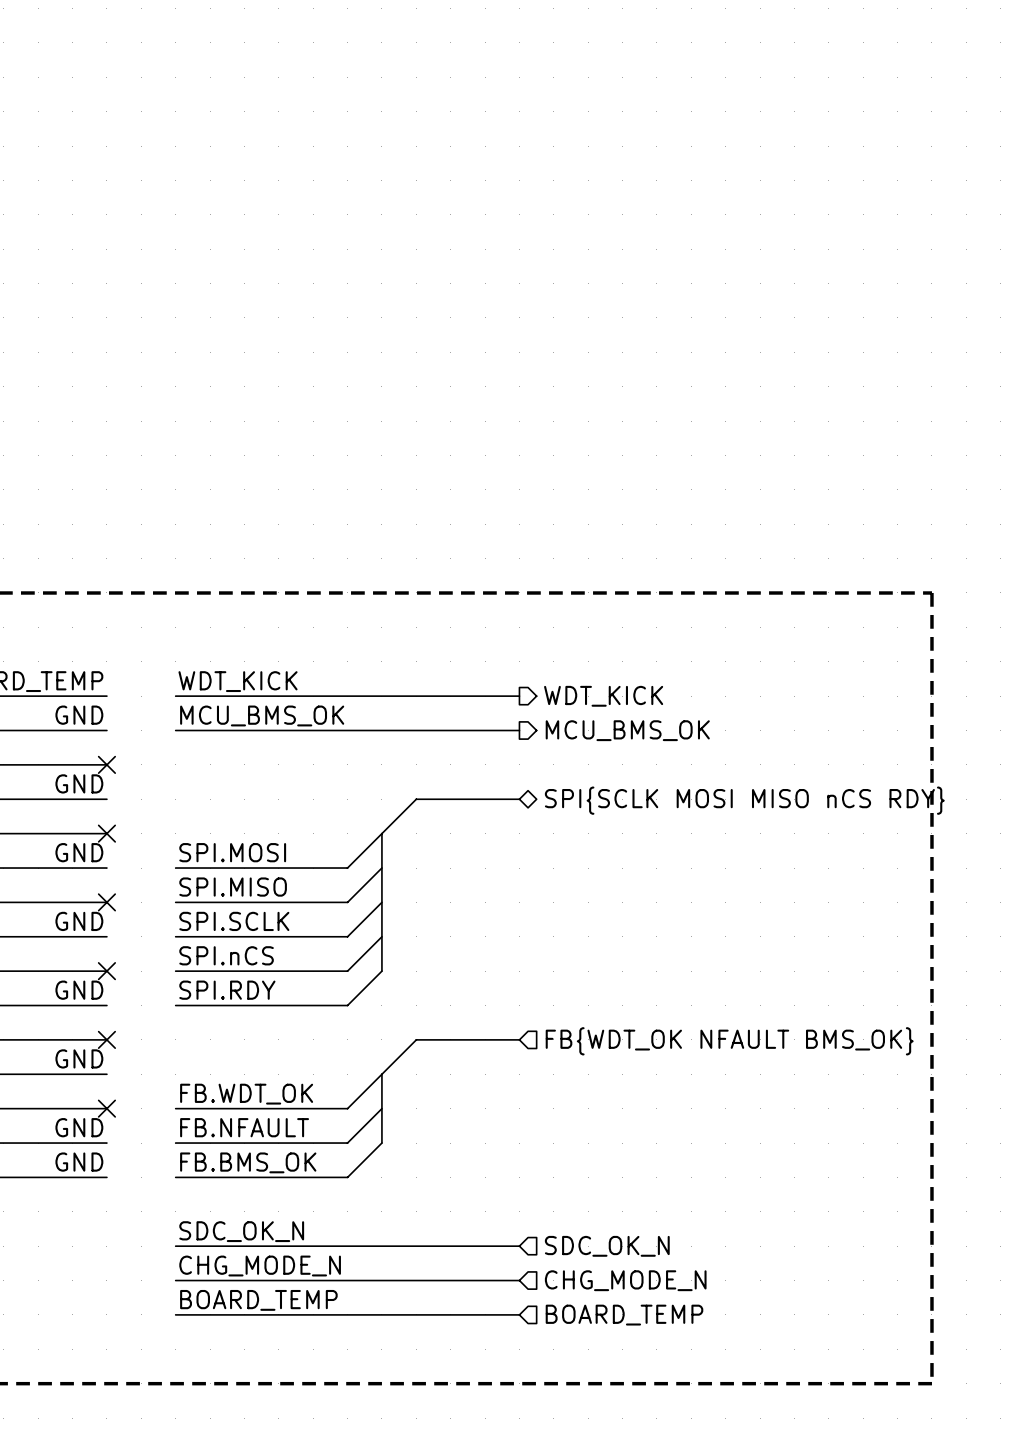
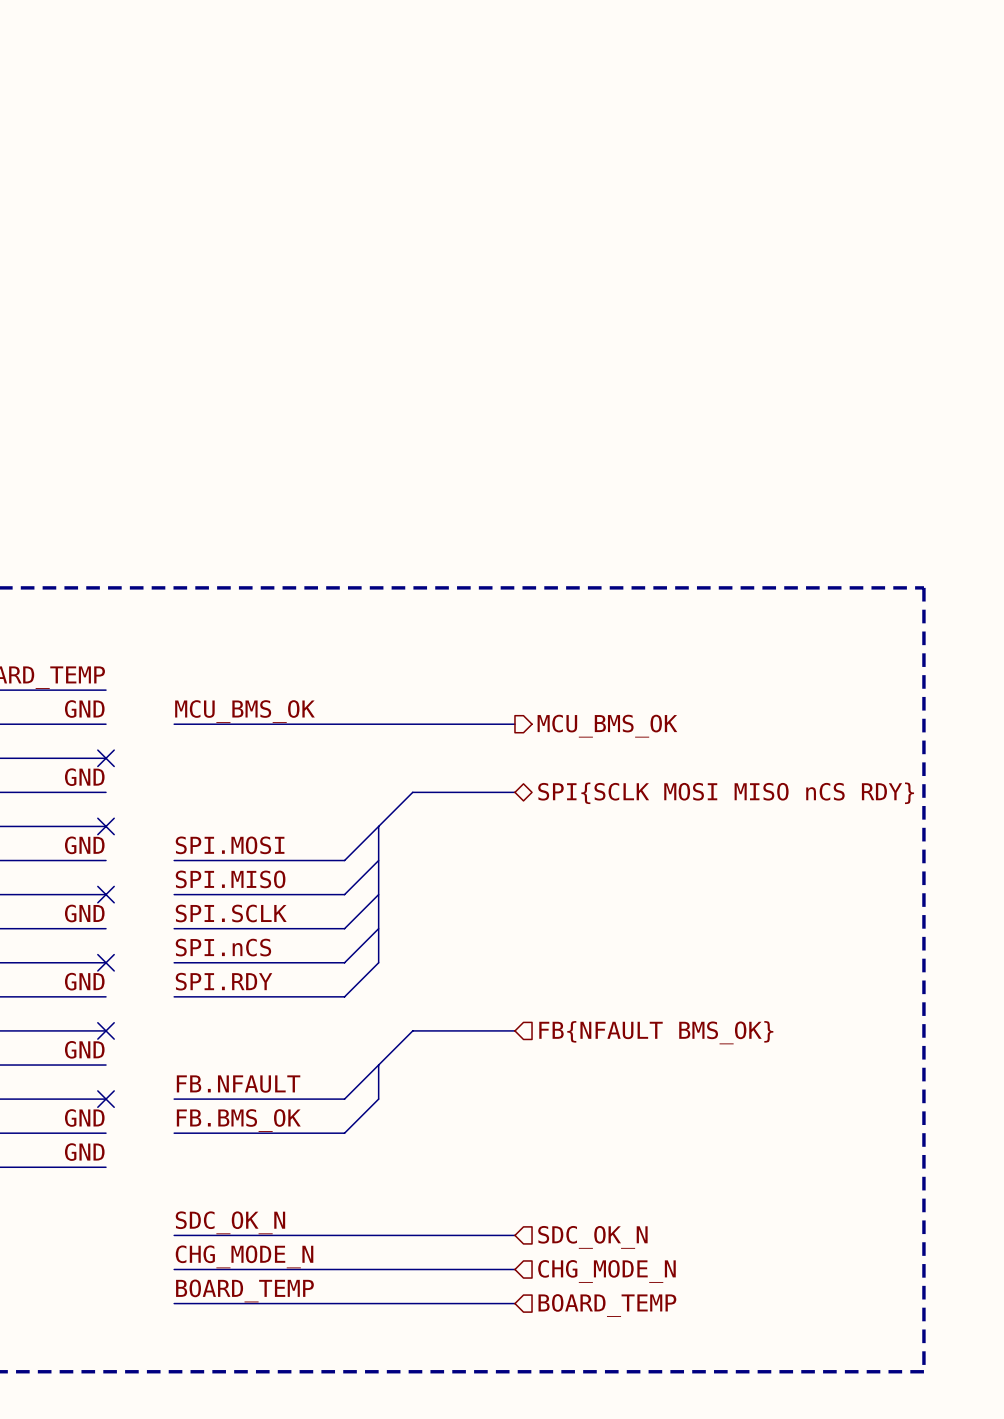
label: WDT_KICK (238, 681) -> none
wire: (175, 696) (519, 696) -> none
hierarchical label: WDT_KICK (603, 696) -> none
hierarchical label: FB{WDT_OK NFAULT BMS_OK} (729, 1041) -> FB{NFAULT BMS_OK} (656, 1032)
label: FB.WDT_OK (246, 1094) -> FB.NFAULT (238, 1084)
bus: (381, 1108) (381, 1143) -> none
label: FB.NFAULT (244, 1127) -> FB.BMS_OK (238, 1120)
wire: (381, 1143) (347, 1177) (175, 1177) -> none
label: FB.BMS_OK (248, 1162) -> none

